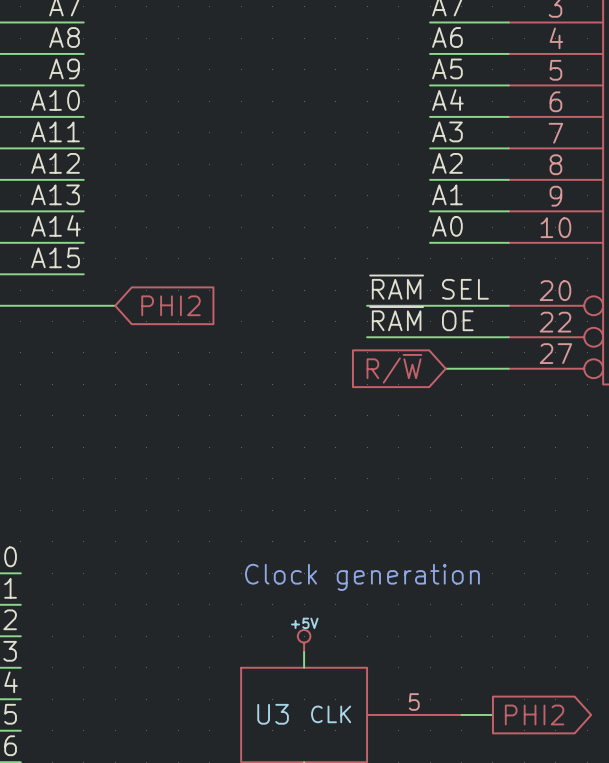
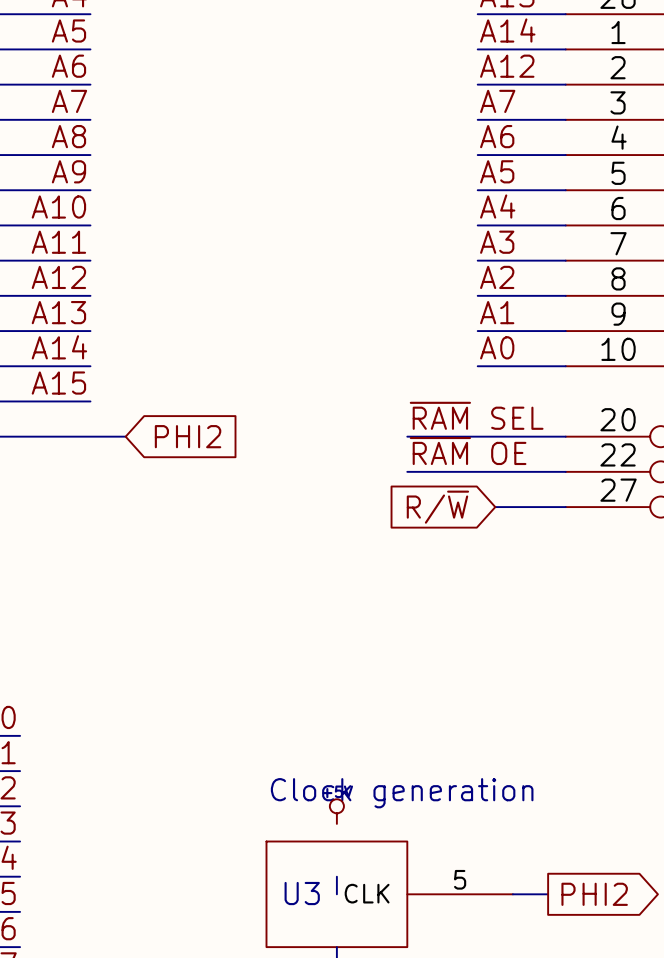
text position: Clock generation (362, 577) -> Clock generation (402, 793)
wire: (304, 652) (304, 667) -> (336, 876) (336, 894)

